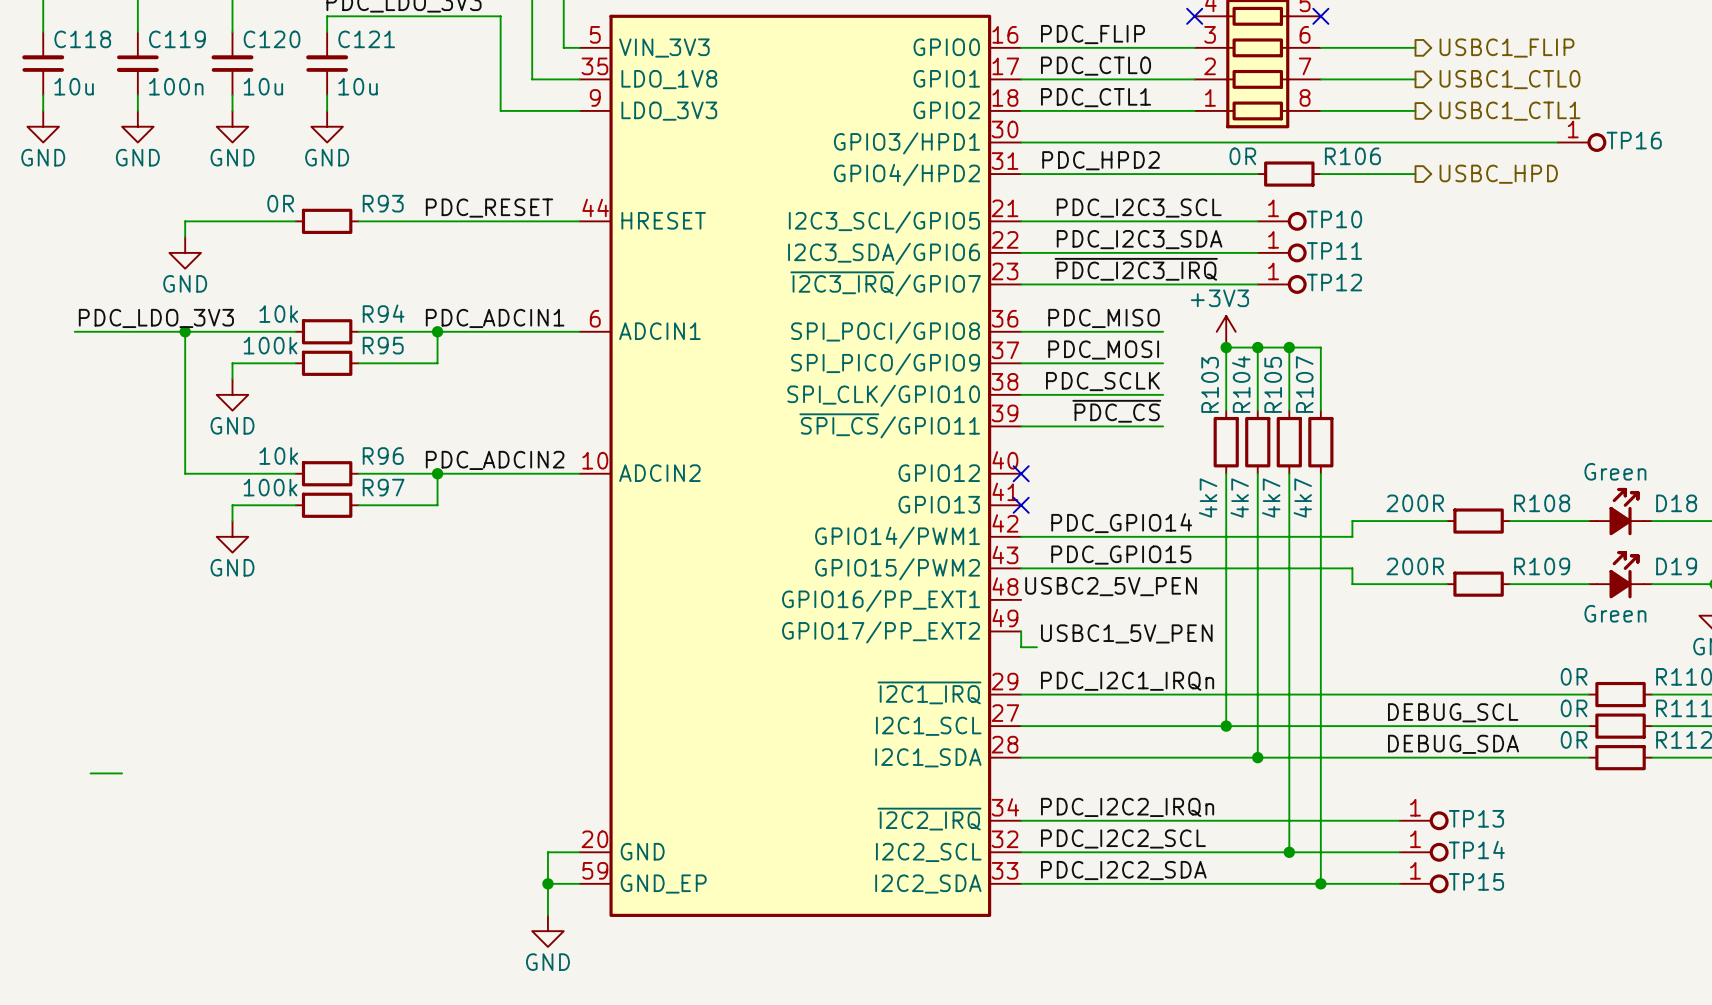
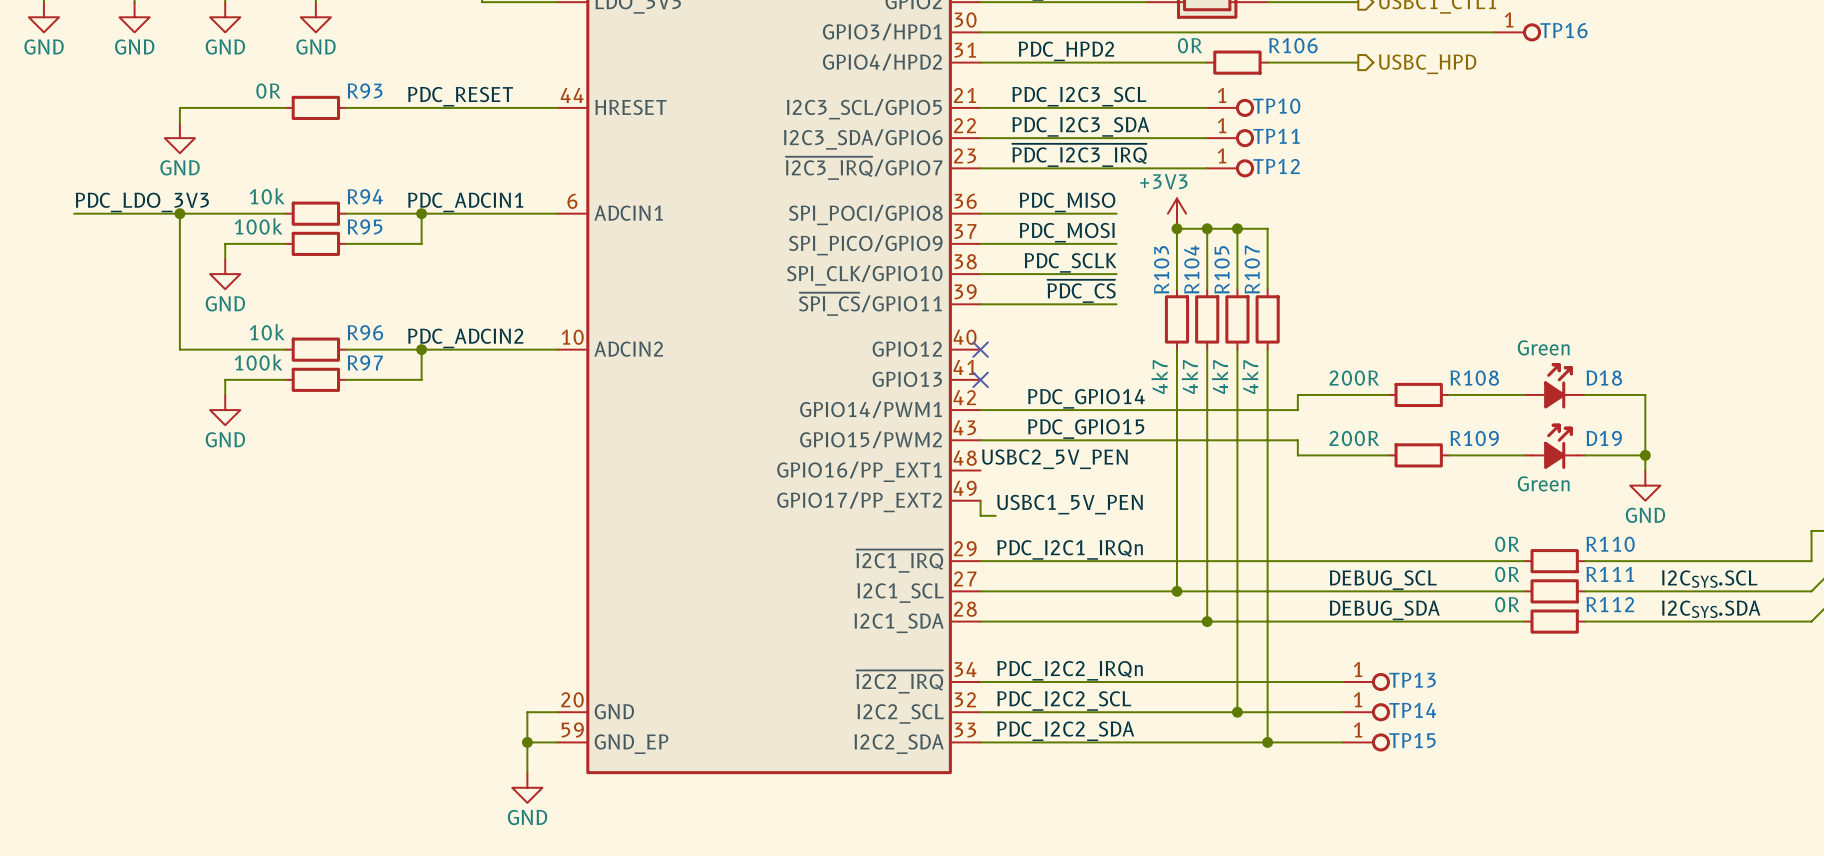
wire: (90, 773) (122, 773) -> none

